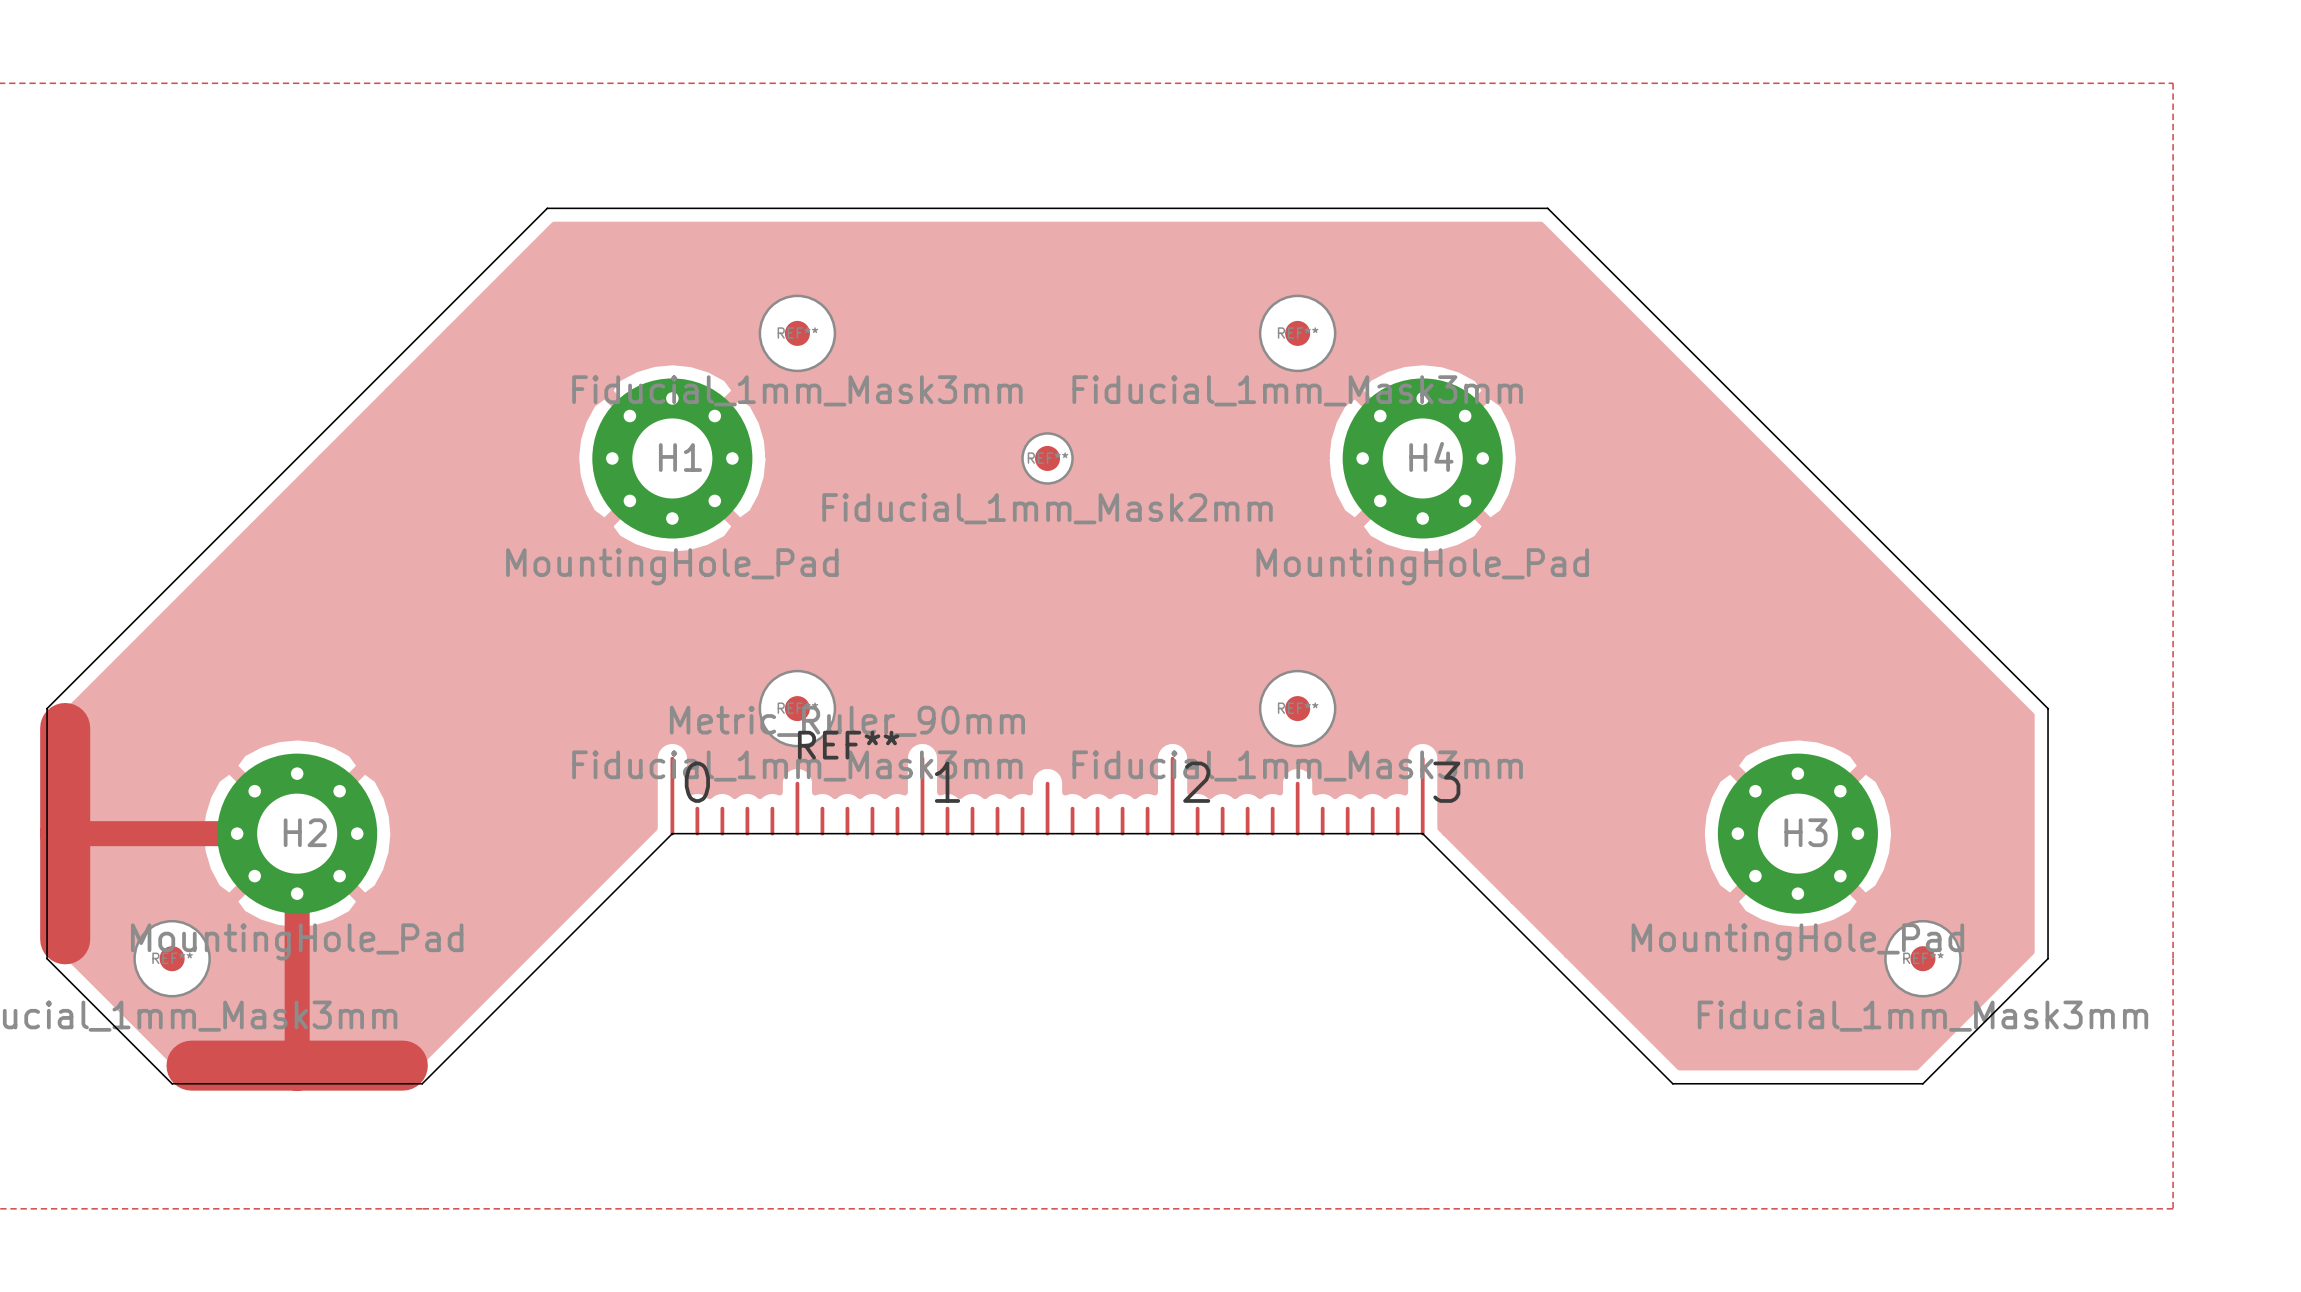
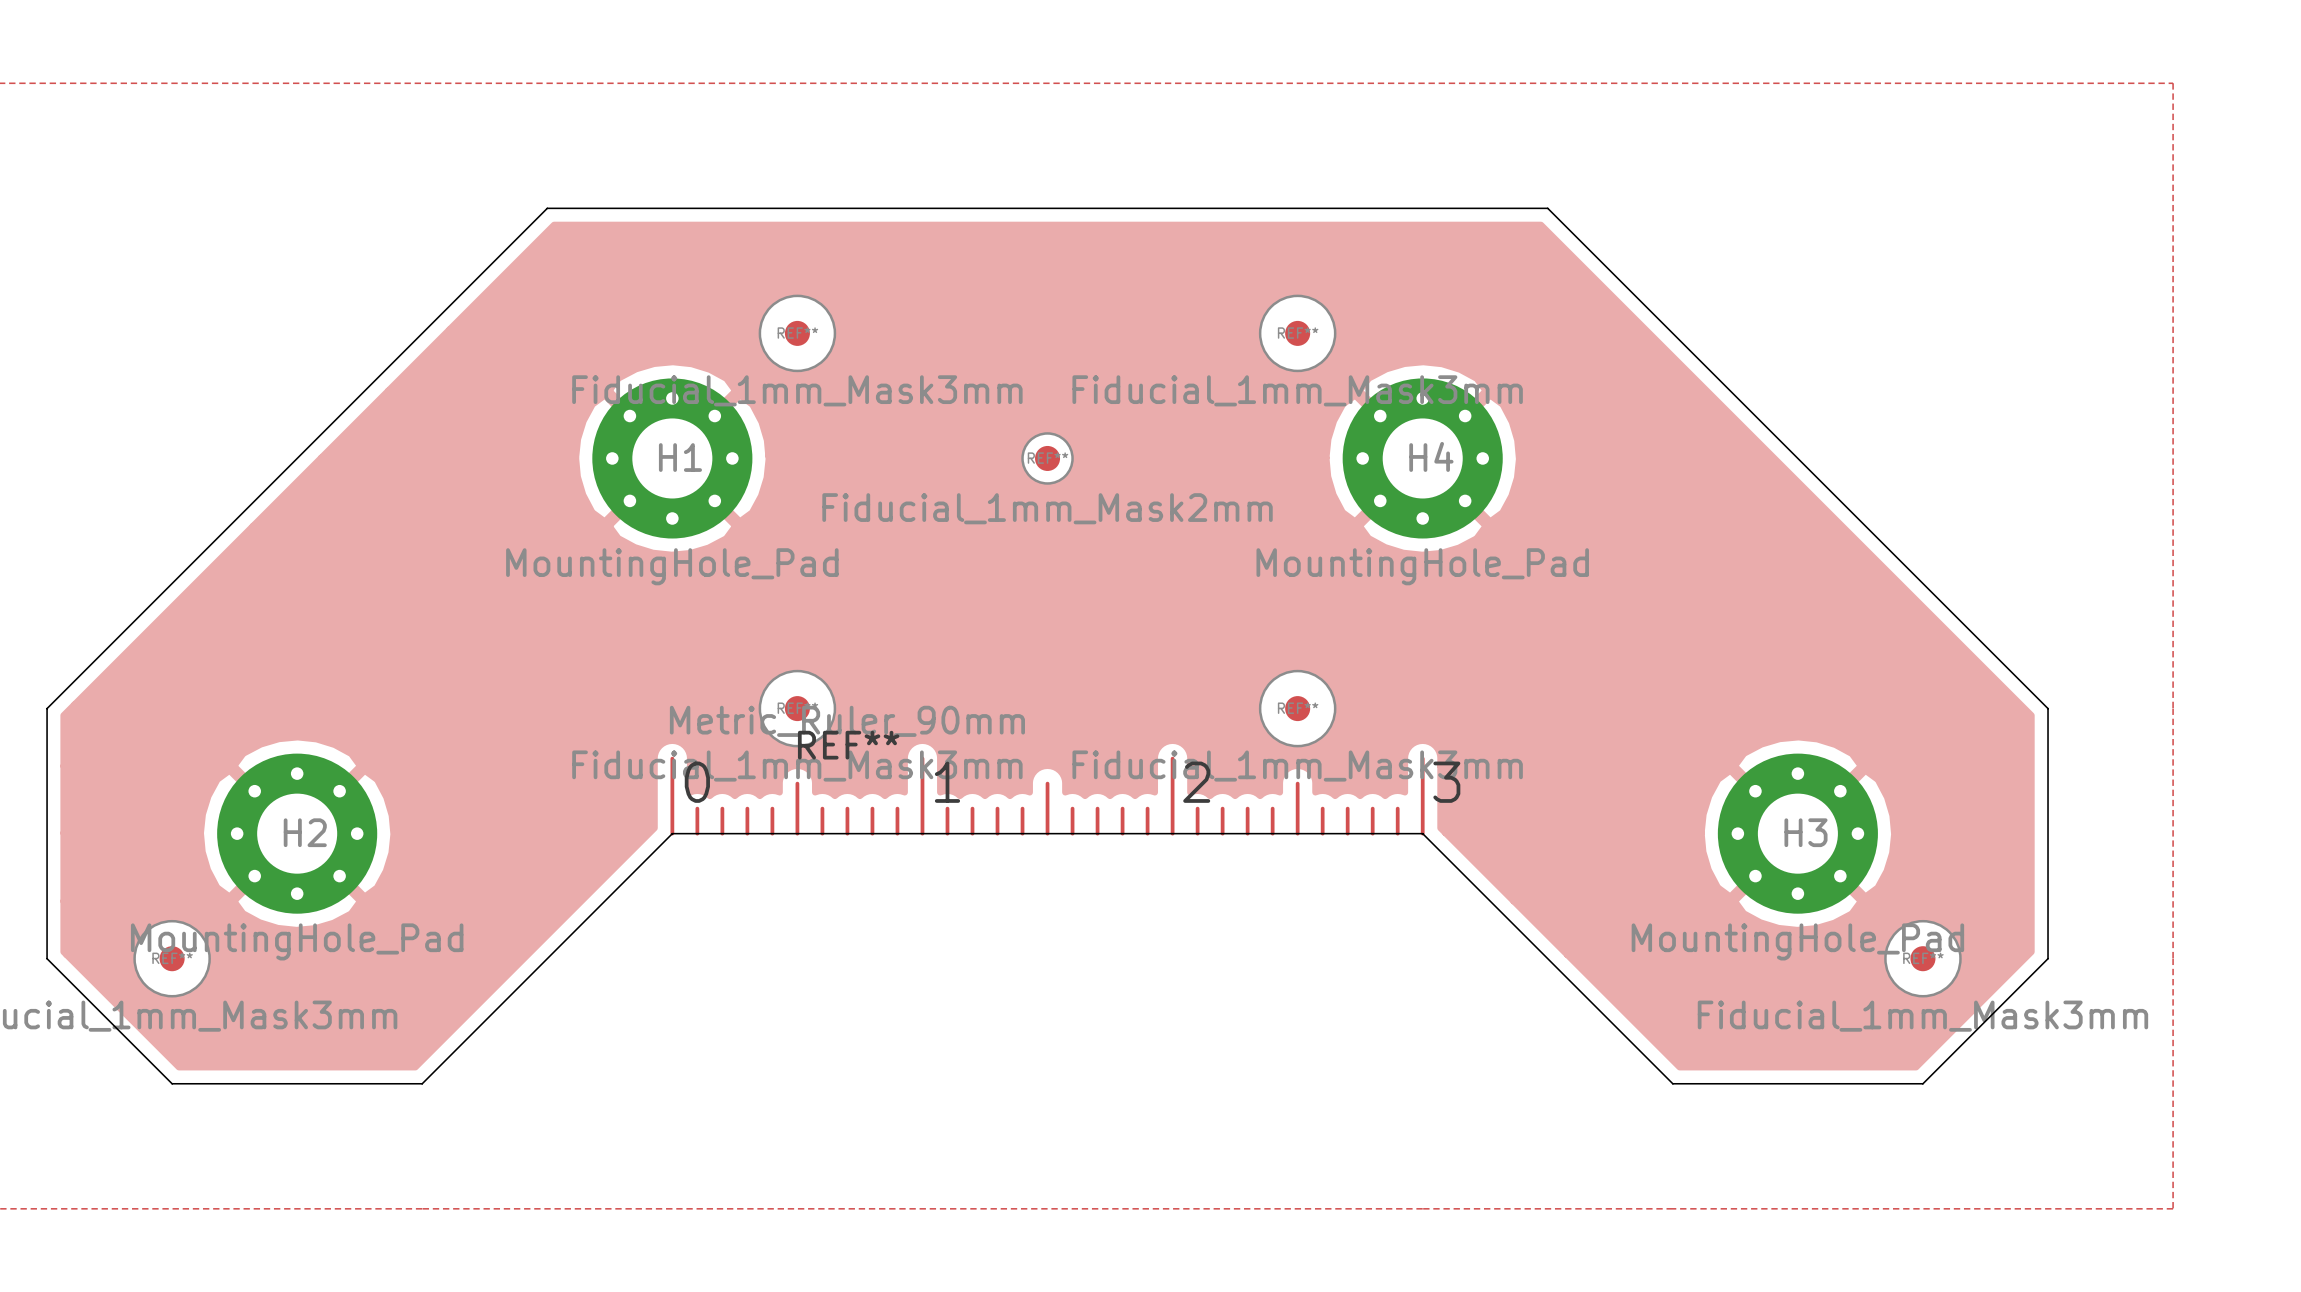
top track: (65, 727) (65, 939) -> none
top track: (65, 833) (297, 833) (297, 1065) -> none
top track: (191, 1065) (402, 1065) -> none

